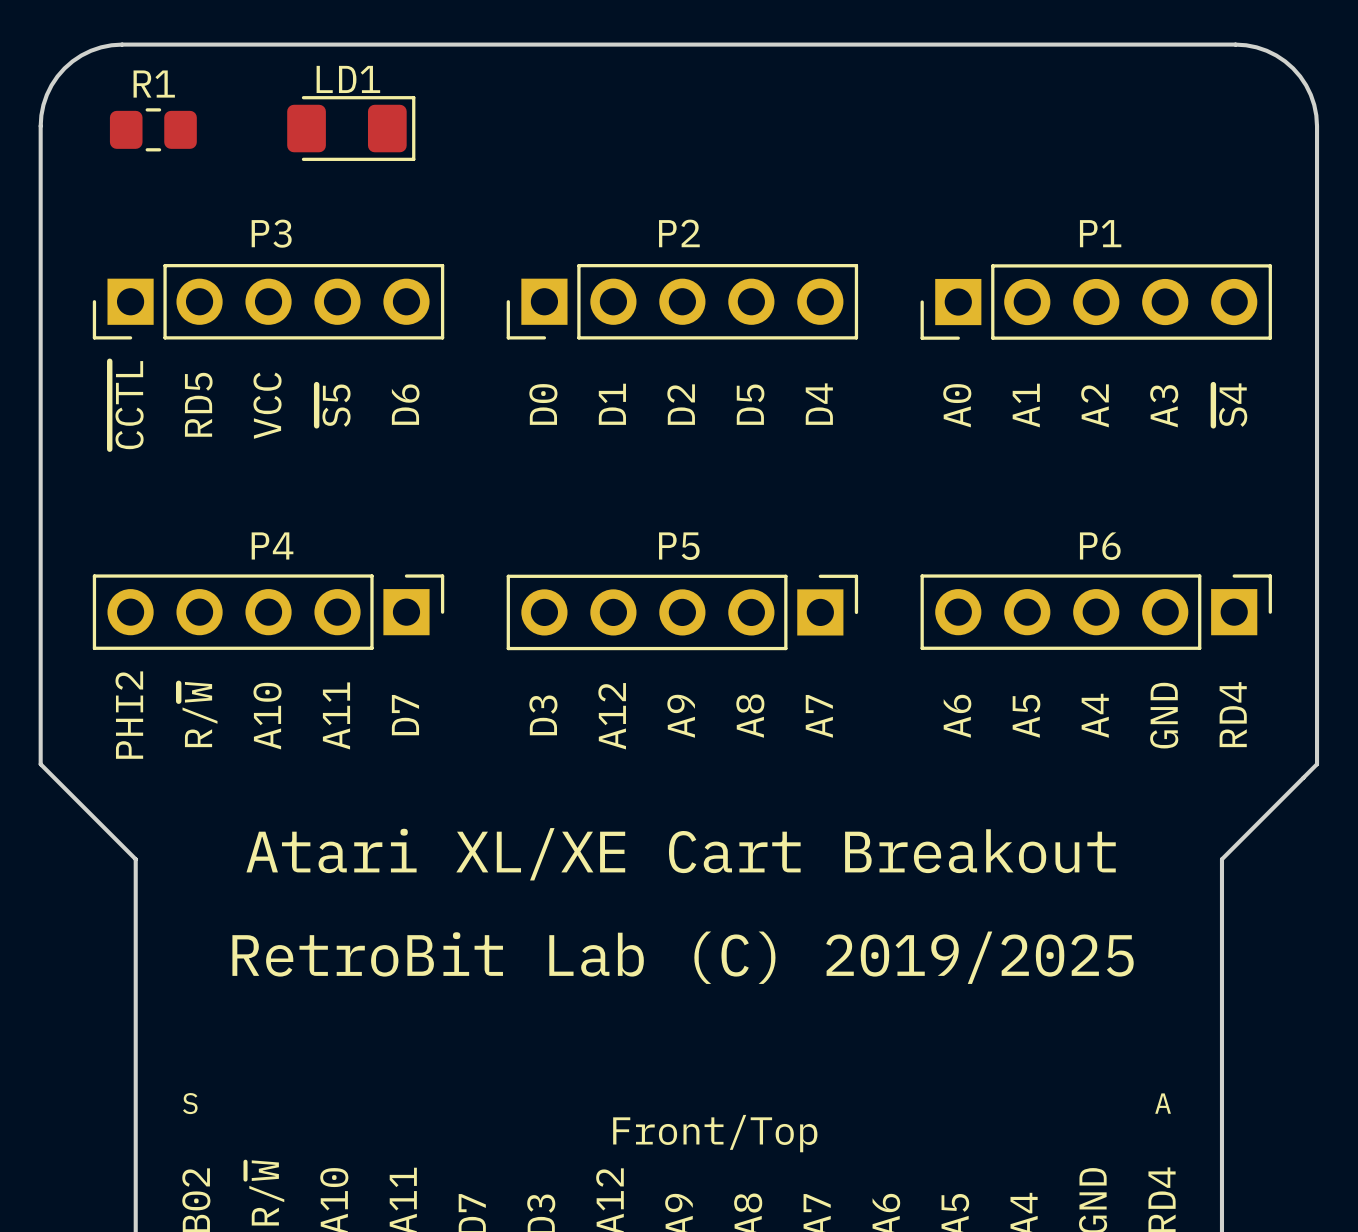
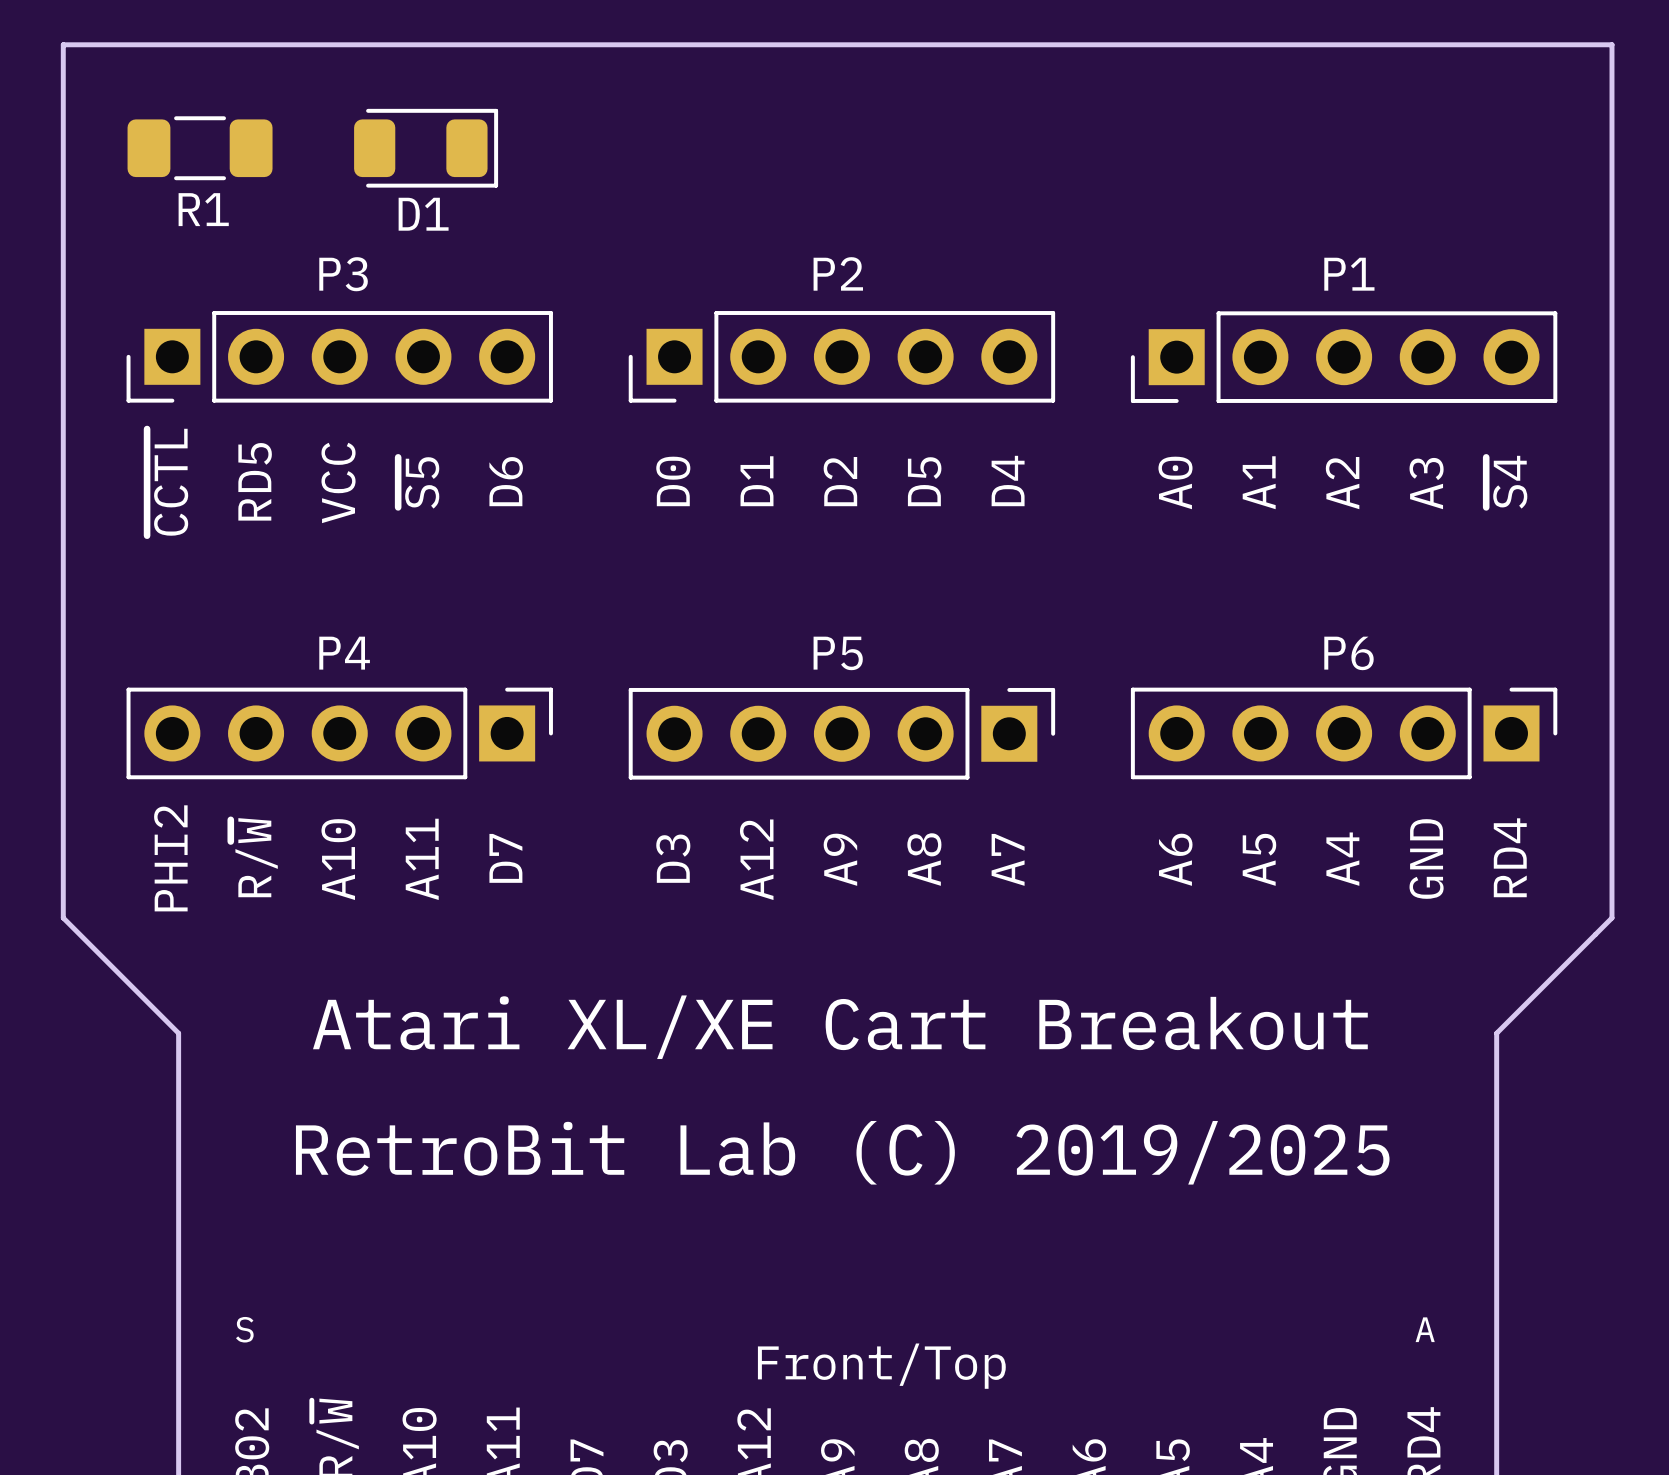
board edge: (122, 44) (90, 50) (64, 68) (46, 94) (40, 126) -> (162, 44) (63, 44) (63, 143)
board edge: (1235, 44) (1266, 50) (1293, 68) (1310, 94) (1317, 126) -> (1513, 44) (1611, 44) (1611, 143)
R1 name position: R1 (154, 84) -> R1 (203, 209)
R1 footprint: [109, 108, 197, 152] -> [127, 116, 273, 181]
LD1: (351, 128) -> none
D1: none -> (426, 148)

